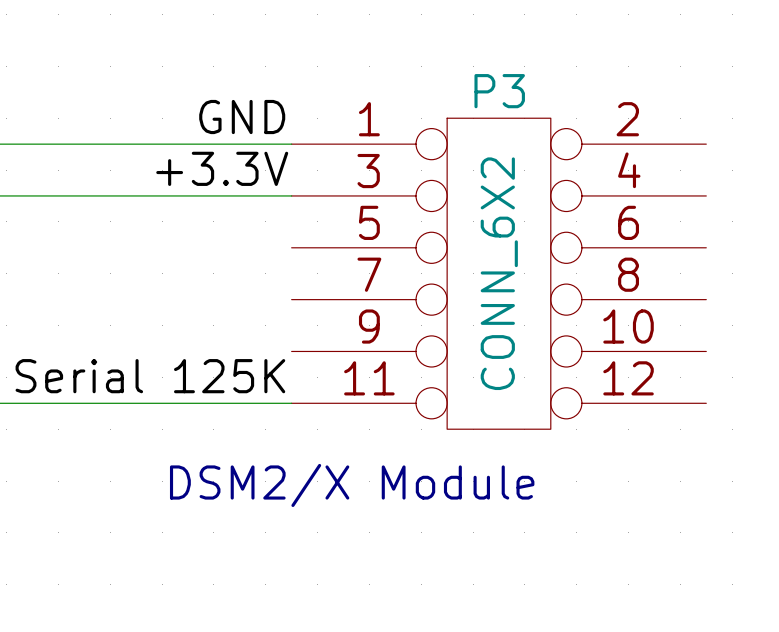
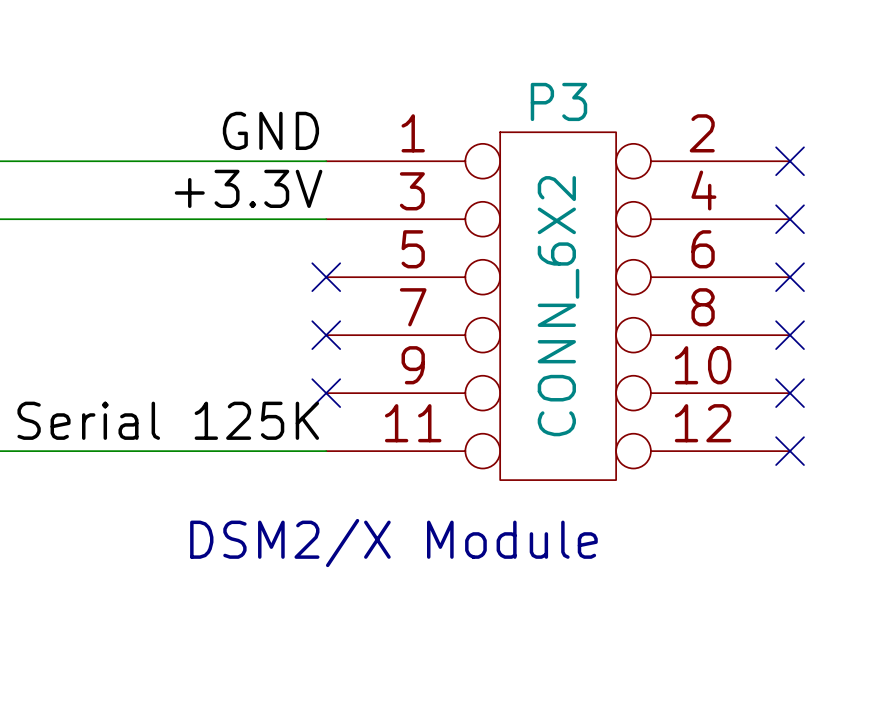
no-connect mark: none -> (790, 161)
no-connect mark: none -> (790, 219)
no-connect mark: none -> (326, 277)
no-connect mark: none -> (790, 277)
no-connect mark: none -> (326, 335)
no-connect mark: none -> (790, 335)
no-connect mark: none -> (326, 393)
no-connect mark: none -> (790, 393)
no-connect mark: none -> (790, 451)

